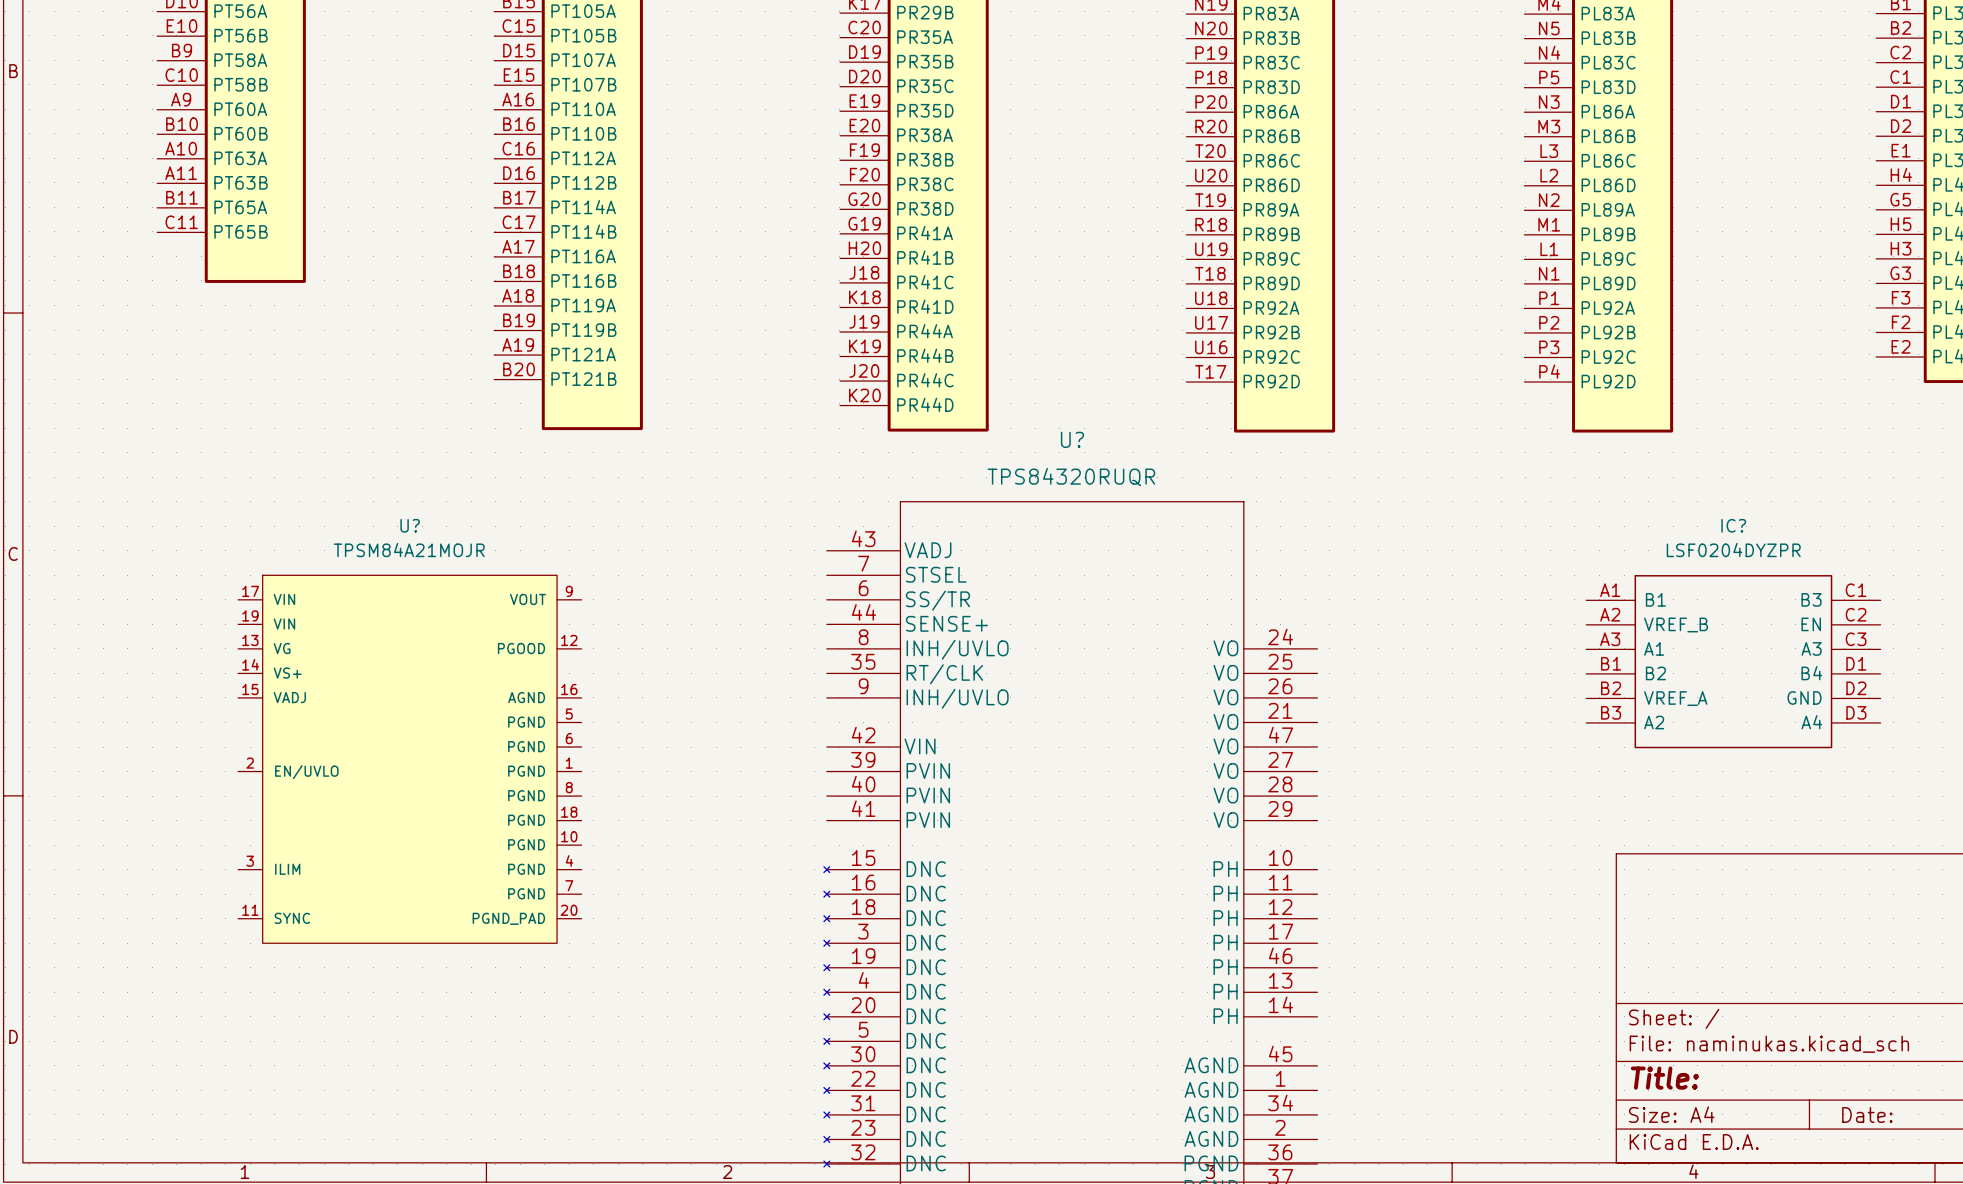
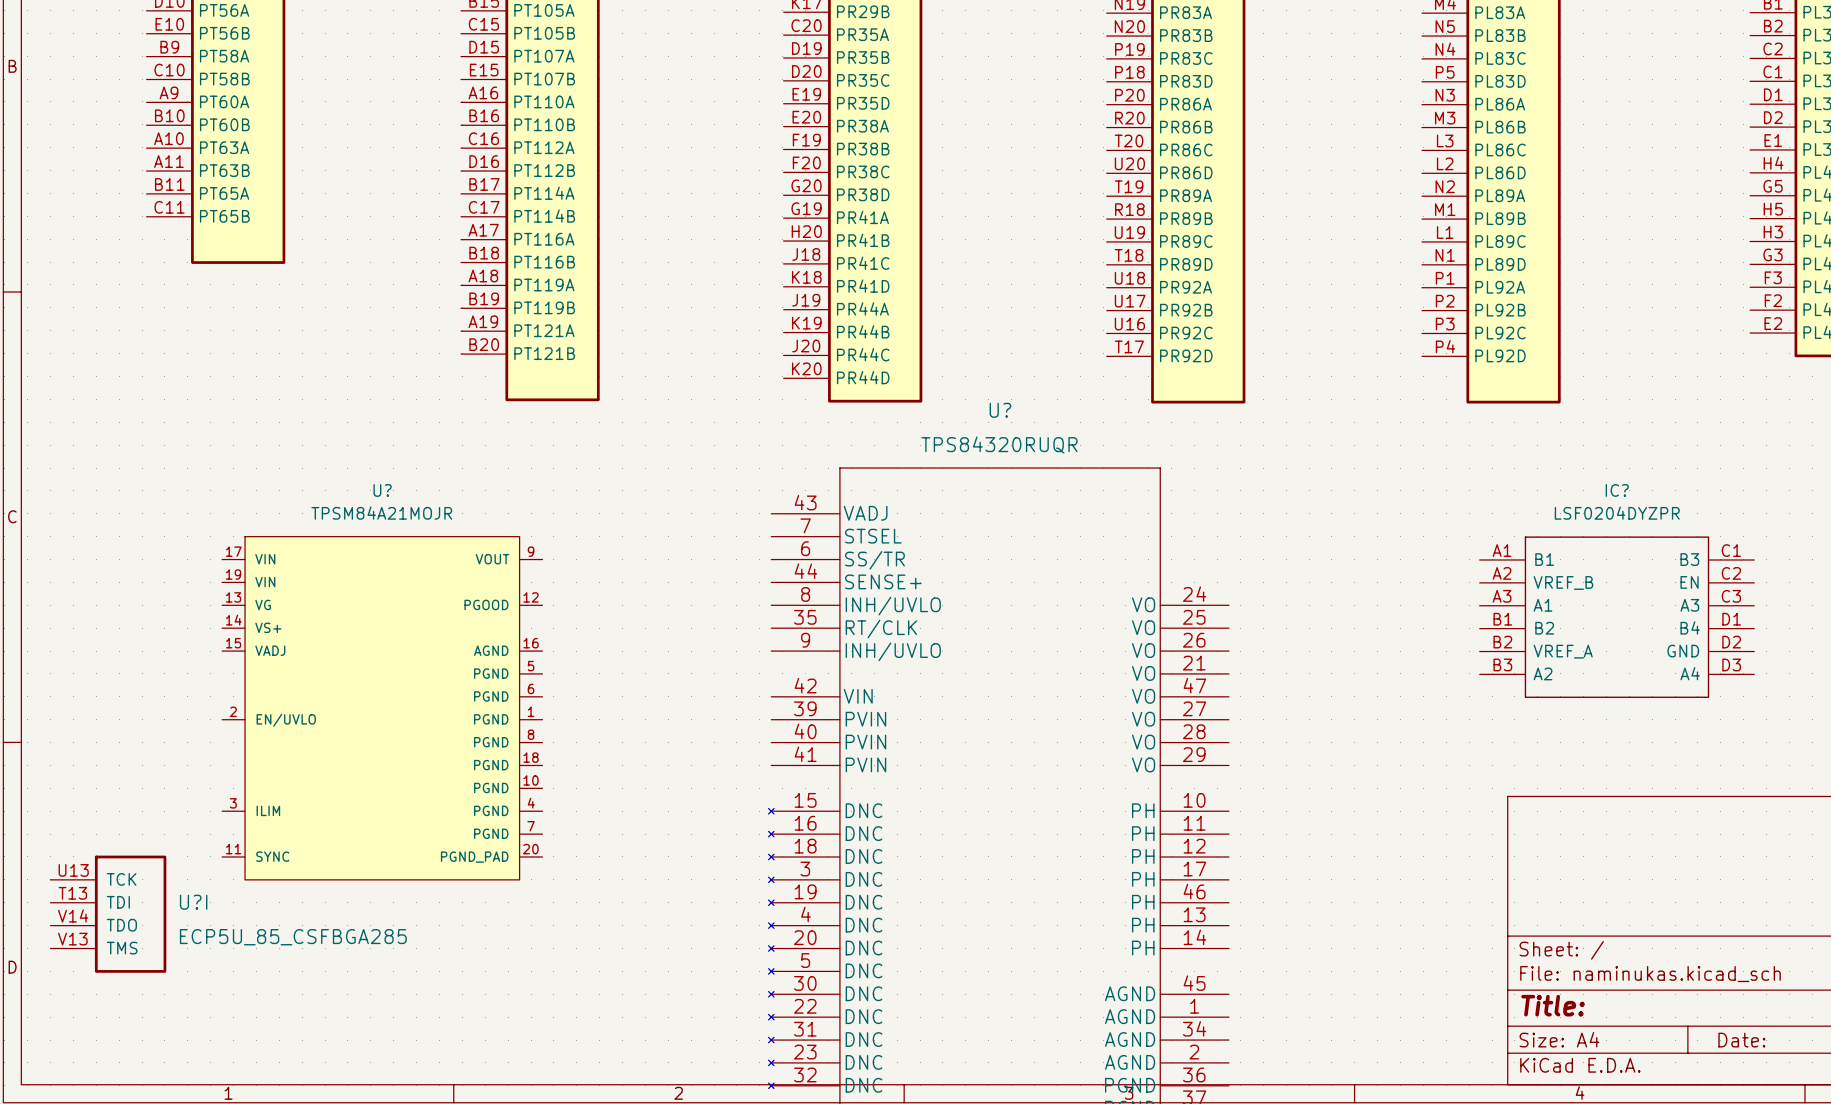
U?I: none -> ECP5U_85_CSFBGA285 (108, 914)

